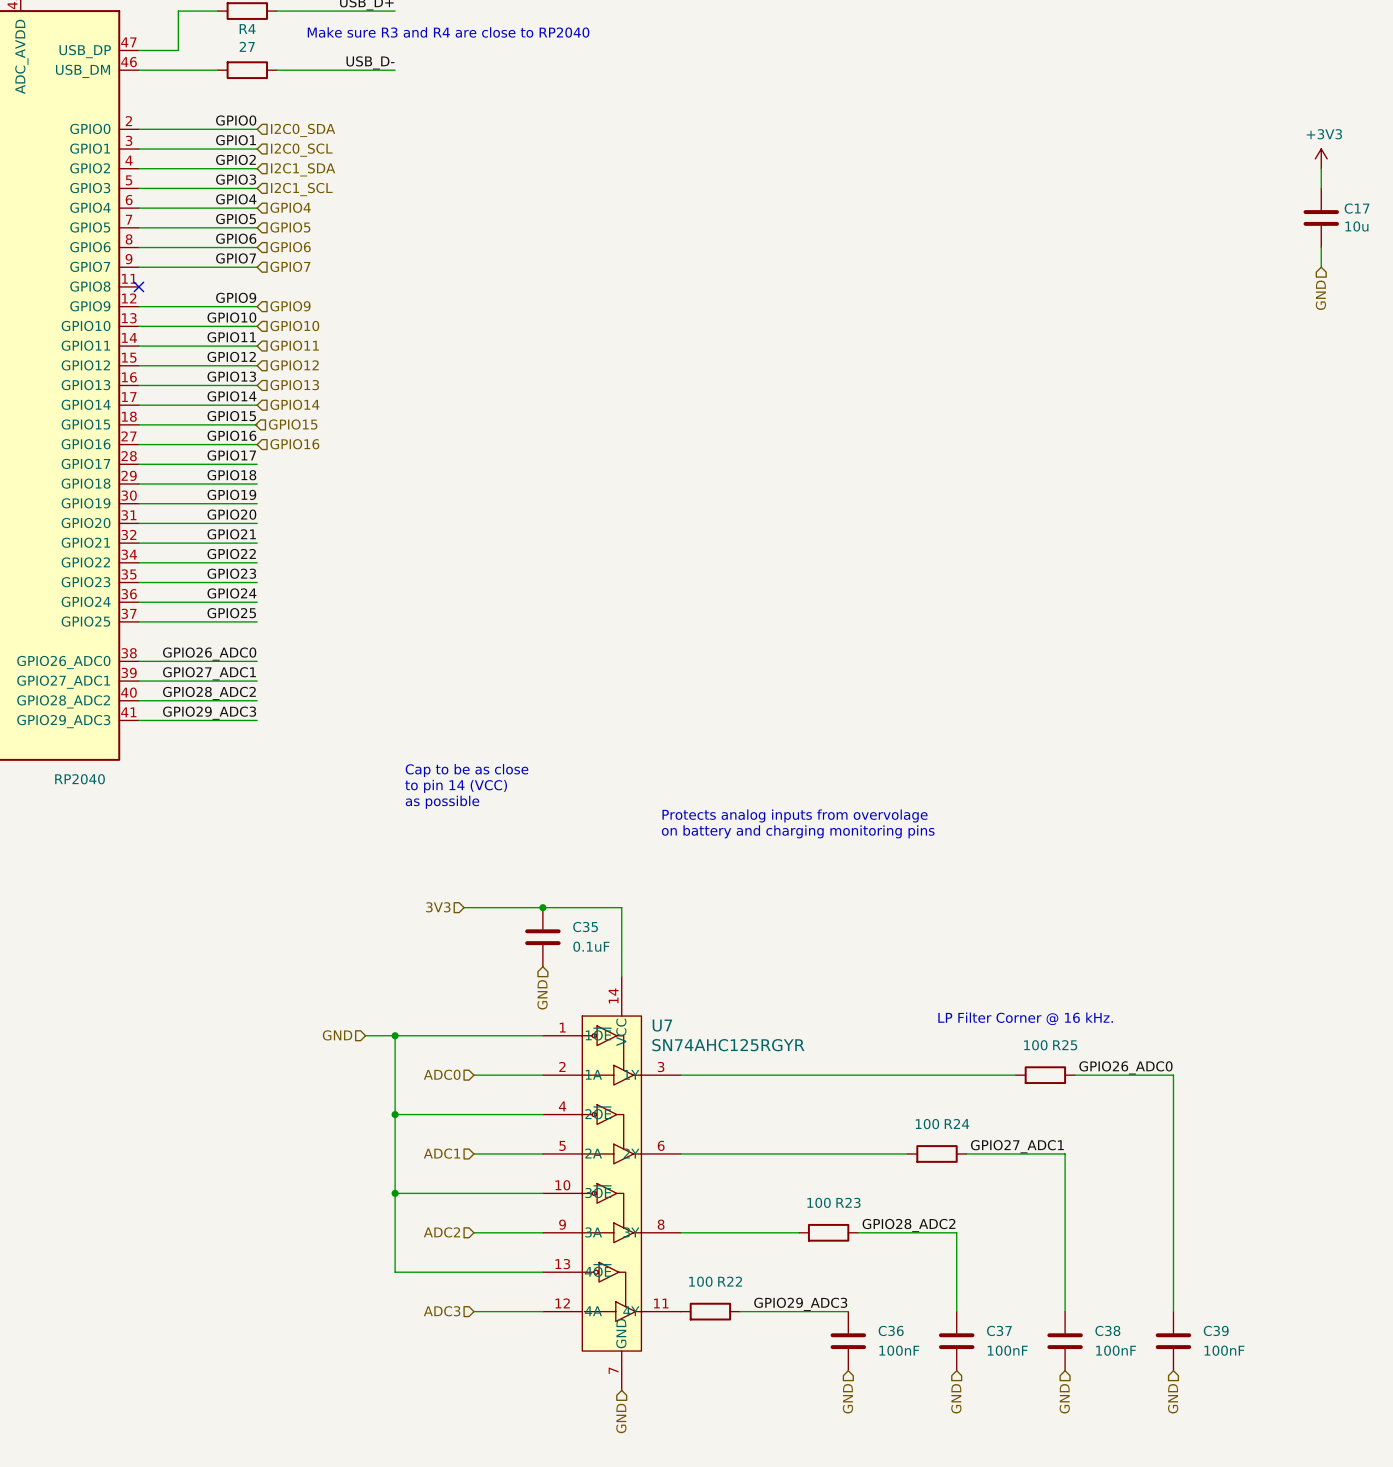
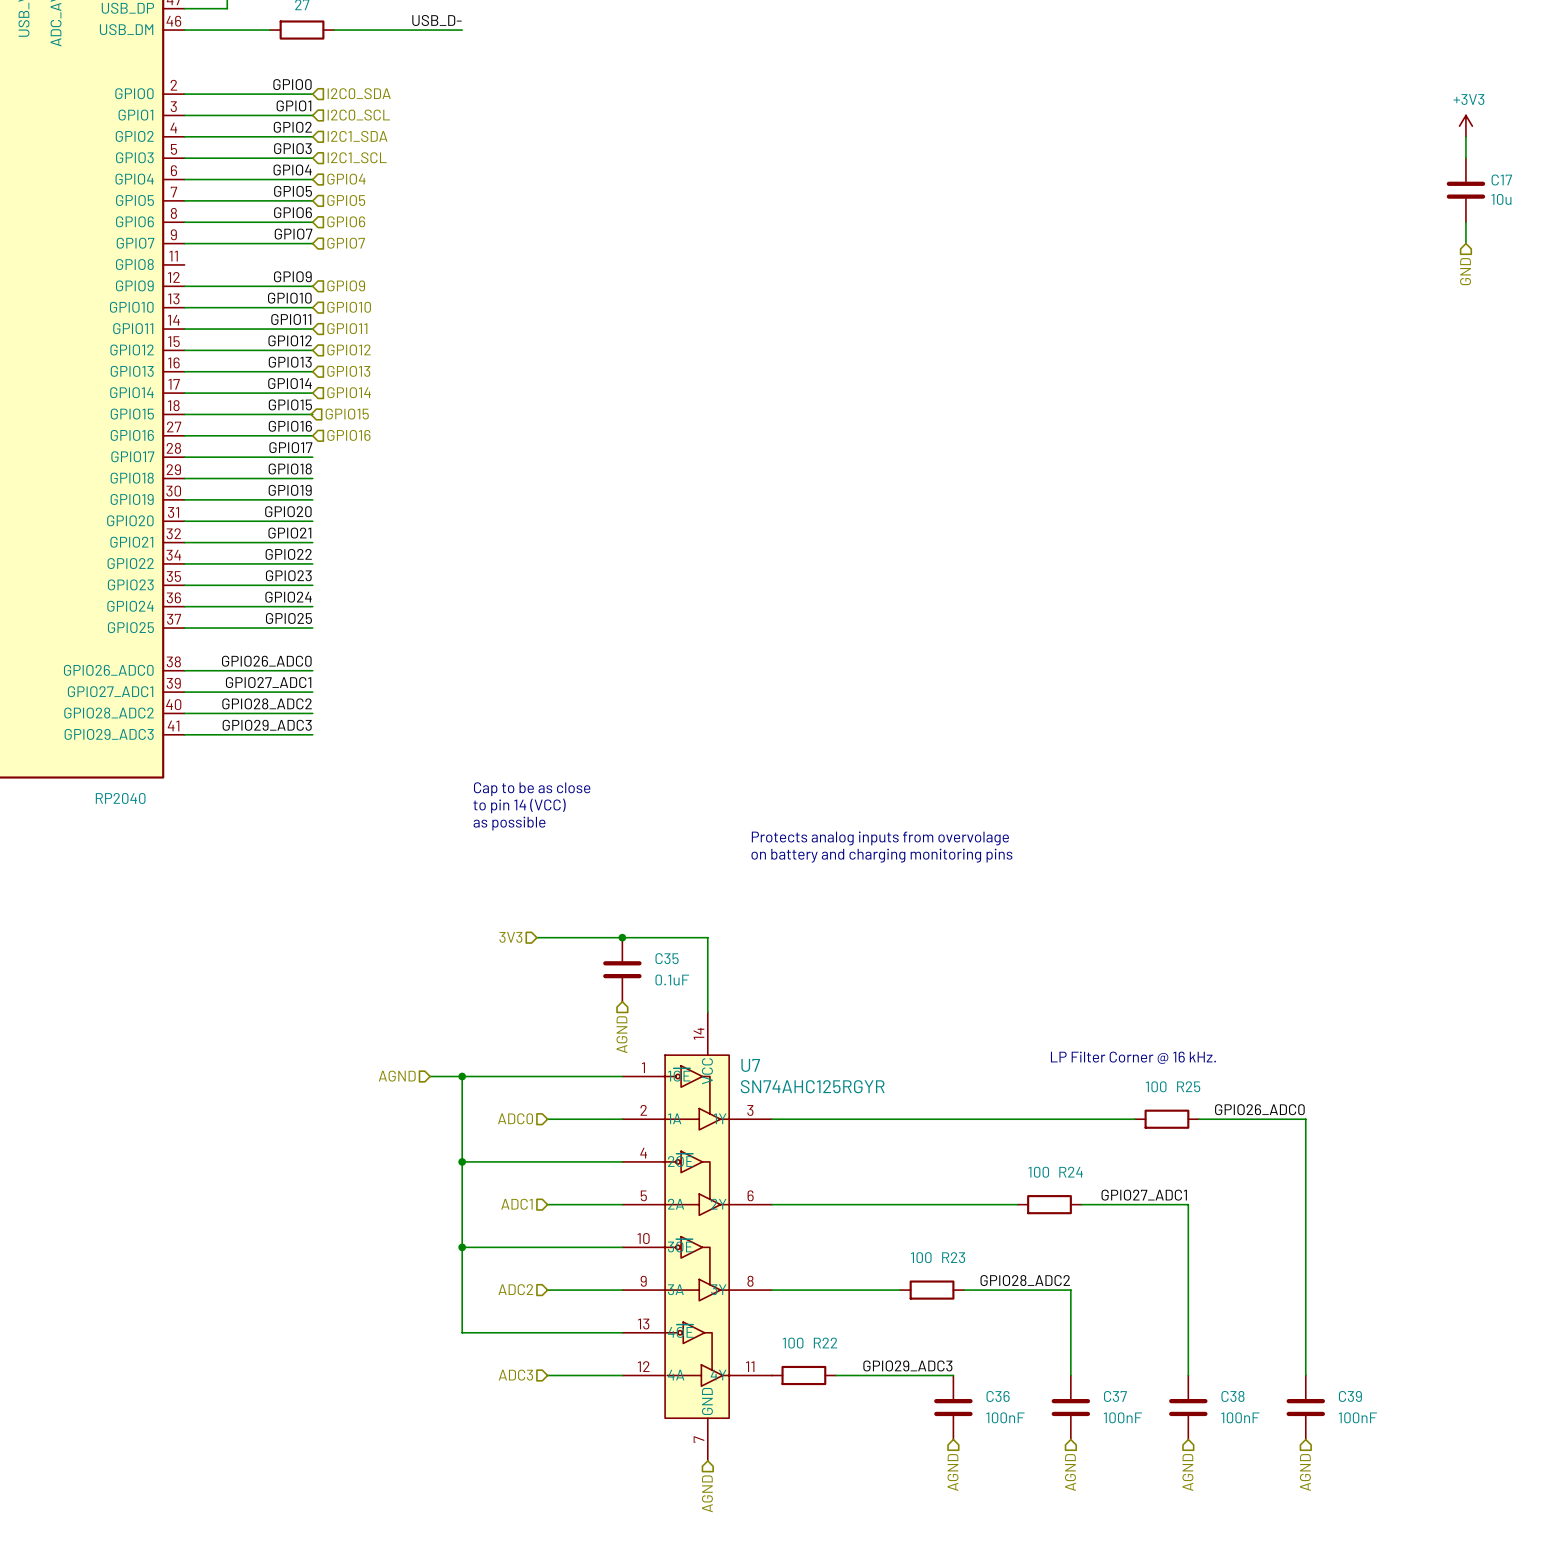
no-connect mark: (138, 286) -> none
hierarchical label: GND (542, 994) -> AGND (621, 1034)
hierarchical label: GND (337, 1035) -> AGND (397, 1076)
hierarchical label: GND (847, 1398) -> AGND (952, 1472)
hierarchical label: GND (956, 1398) -> AGND (1070, 1472)
hierarchical label: GND (1064, 1398) -> AGND (1187, 1472)
hierarchical label: GND (1173, 1398) -> AGND (1305, 1472)
hierarchical label: GND (621, 1418) -> AGND (707, 1493)

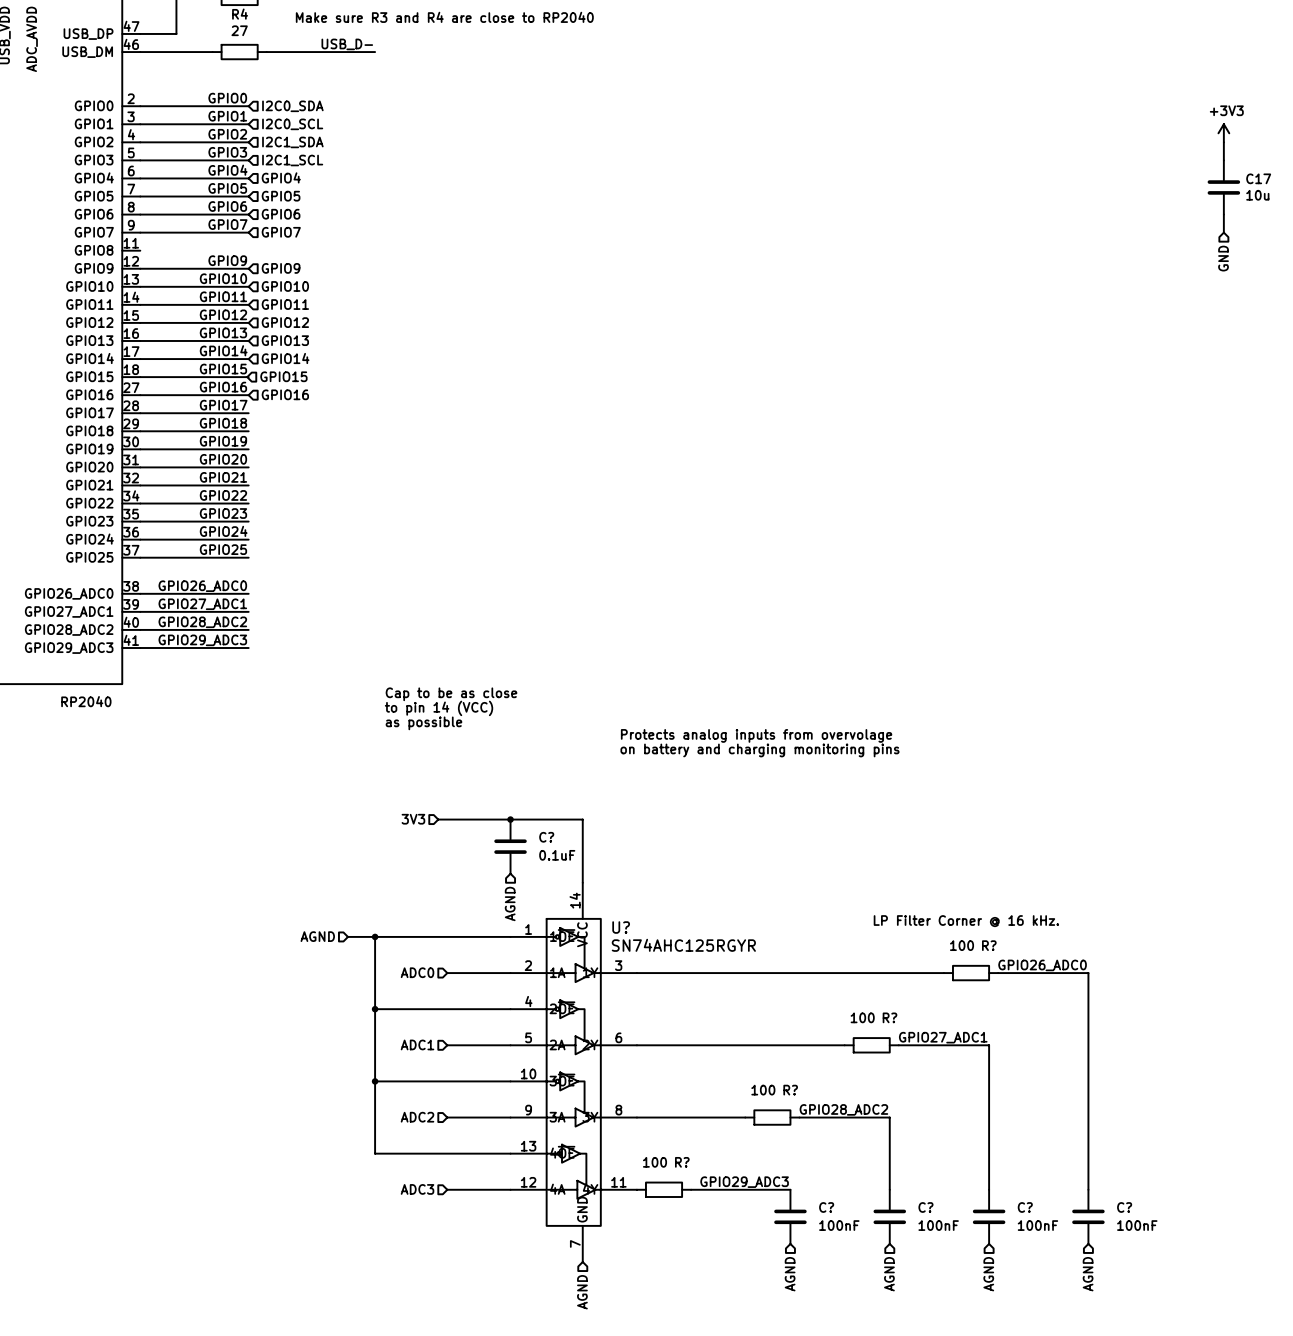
C35 name: C35 (667, 958) -> C? (546, 837)
U7 name: U7 (750, 1065) -> U? (621, 927)
R25 name: R25 (1188, 1086) -> R? (989, 945)
R24 name: R24 (1071, 1172) -> R? (889, 1017)
R23 name: R23 (953, 1257) -> R? (790, 1090)
R22 name: R22 (825, 1343) -> R? (682, 1162)
C36 name: C36 (998, 1396) -> C? (826, 1207)
C37 name: C37 (1115, 1396) -> C? (925, 1207)
C38 name: C38 (1232, 1396) -> C? (1025, 1207)
C39 name: C39 (1350, 1396) -> C? (1124, 1207)

